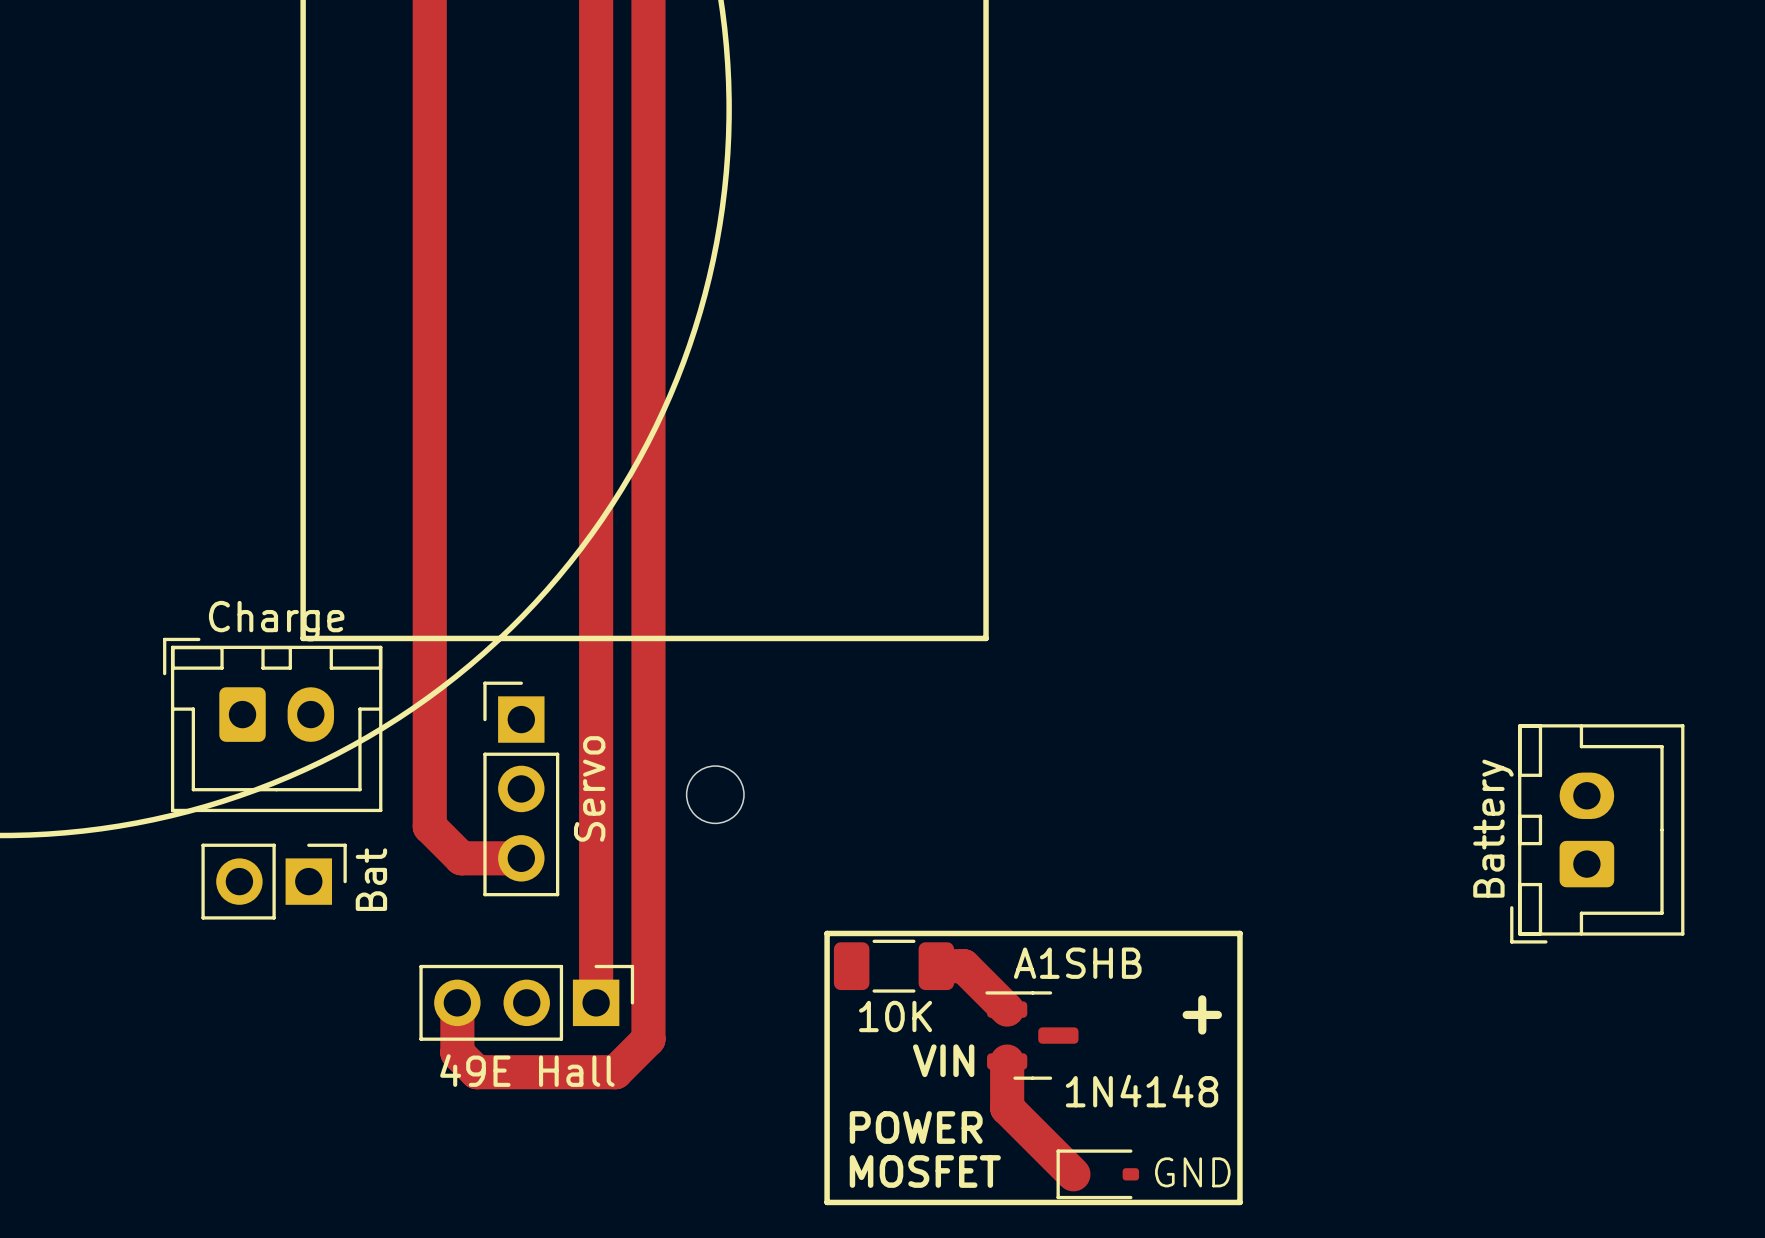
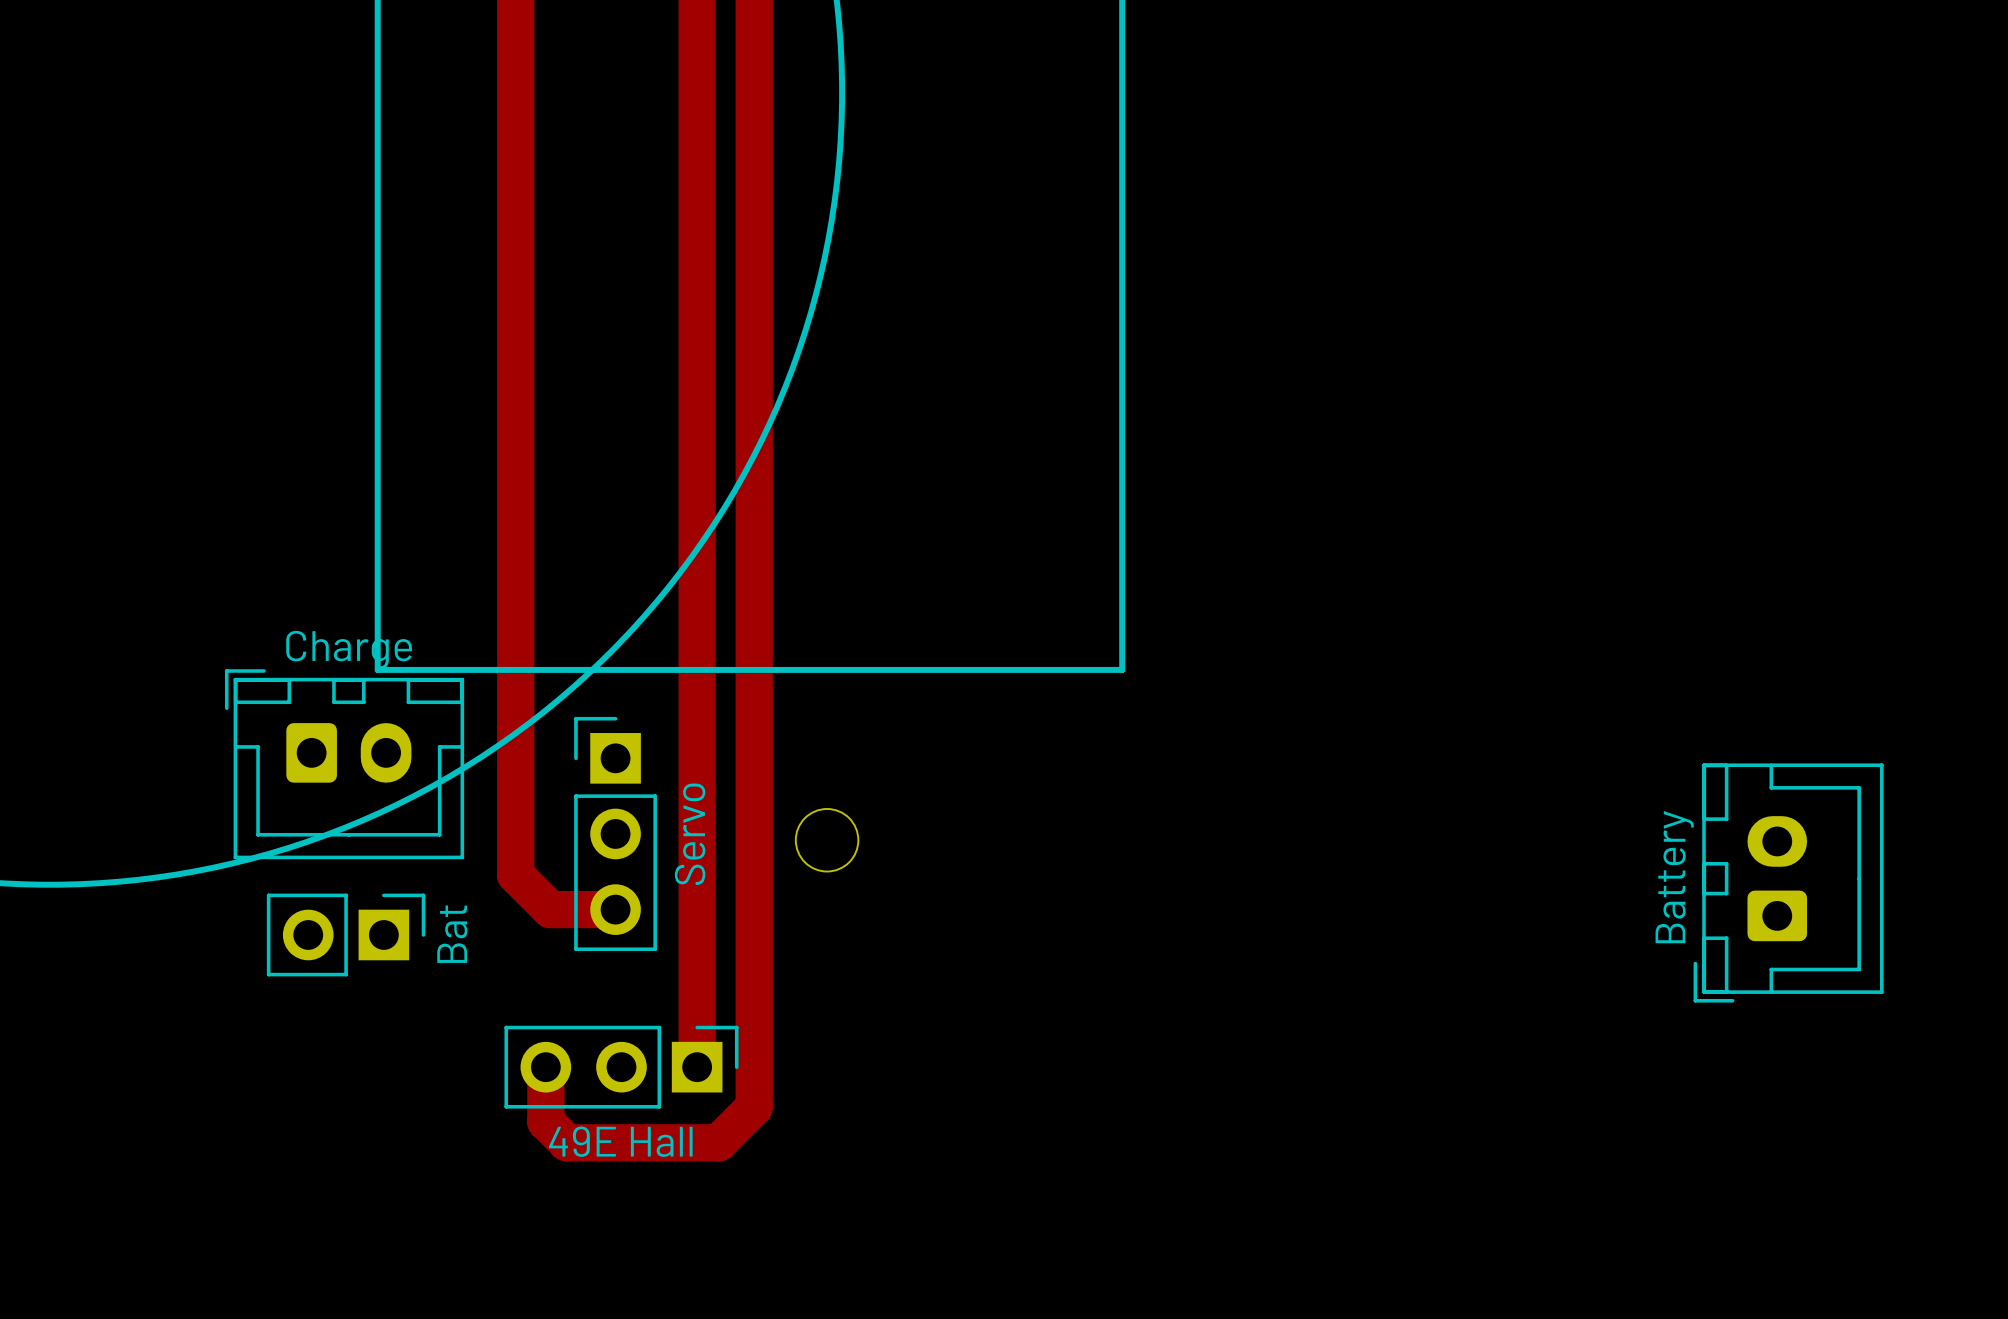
line: (827, 933) (1239, 933) (1239, 1202) (827, 1202) (827, 933) -> none
10K: (894, 966) -> none
track: (936, 966) (963, 966) (1007, 1009) -> none
text: + (1202, 1014) -> none
A1SHB: (1031, 1035) -> none
text: VIN (943, 1060) -> none
track: (1007, 1061) (1007, 1108) (1073, 1174) -> none
text: POWER (916, 1127) -> none
text: MOSFET (925, 1171) -> none
text: GND (1192, 1172) -> none
1N4148: (1097, 1174) -> none

